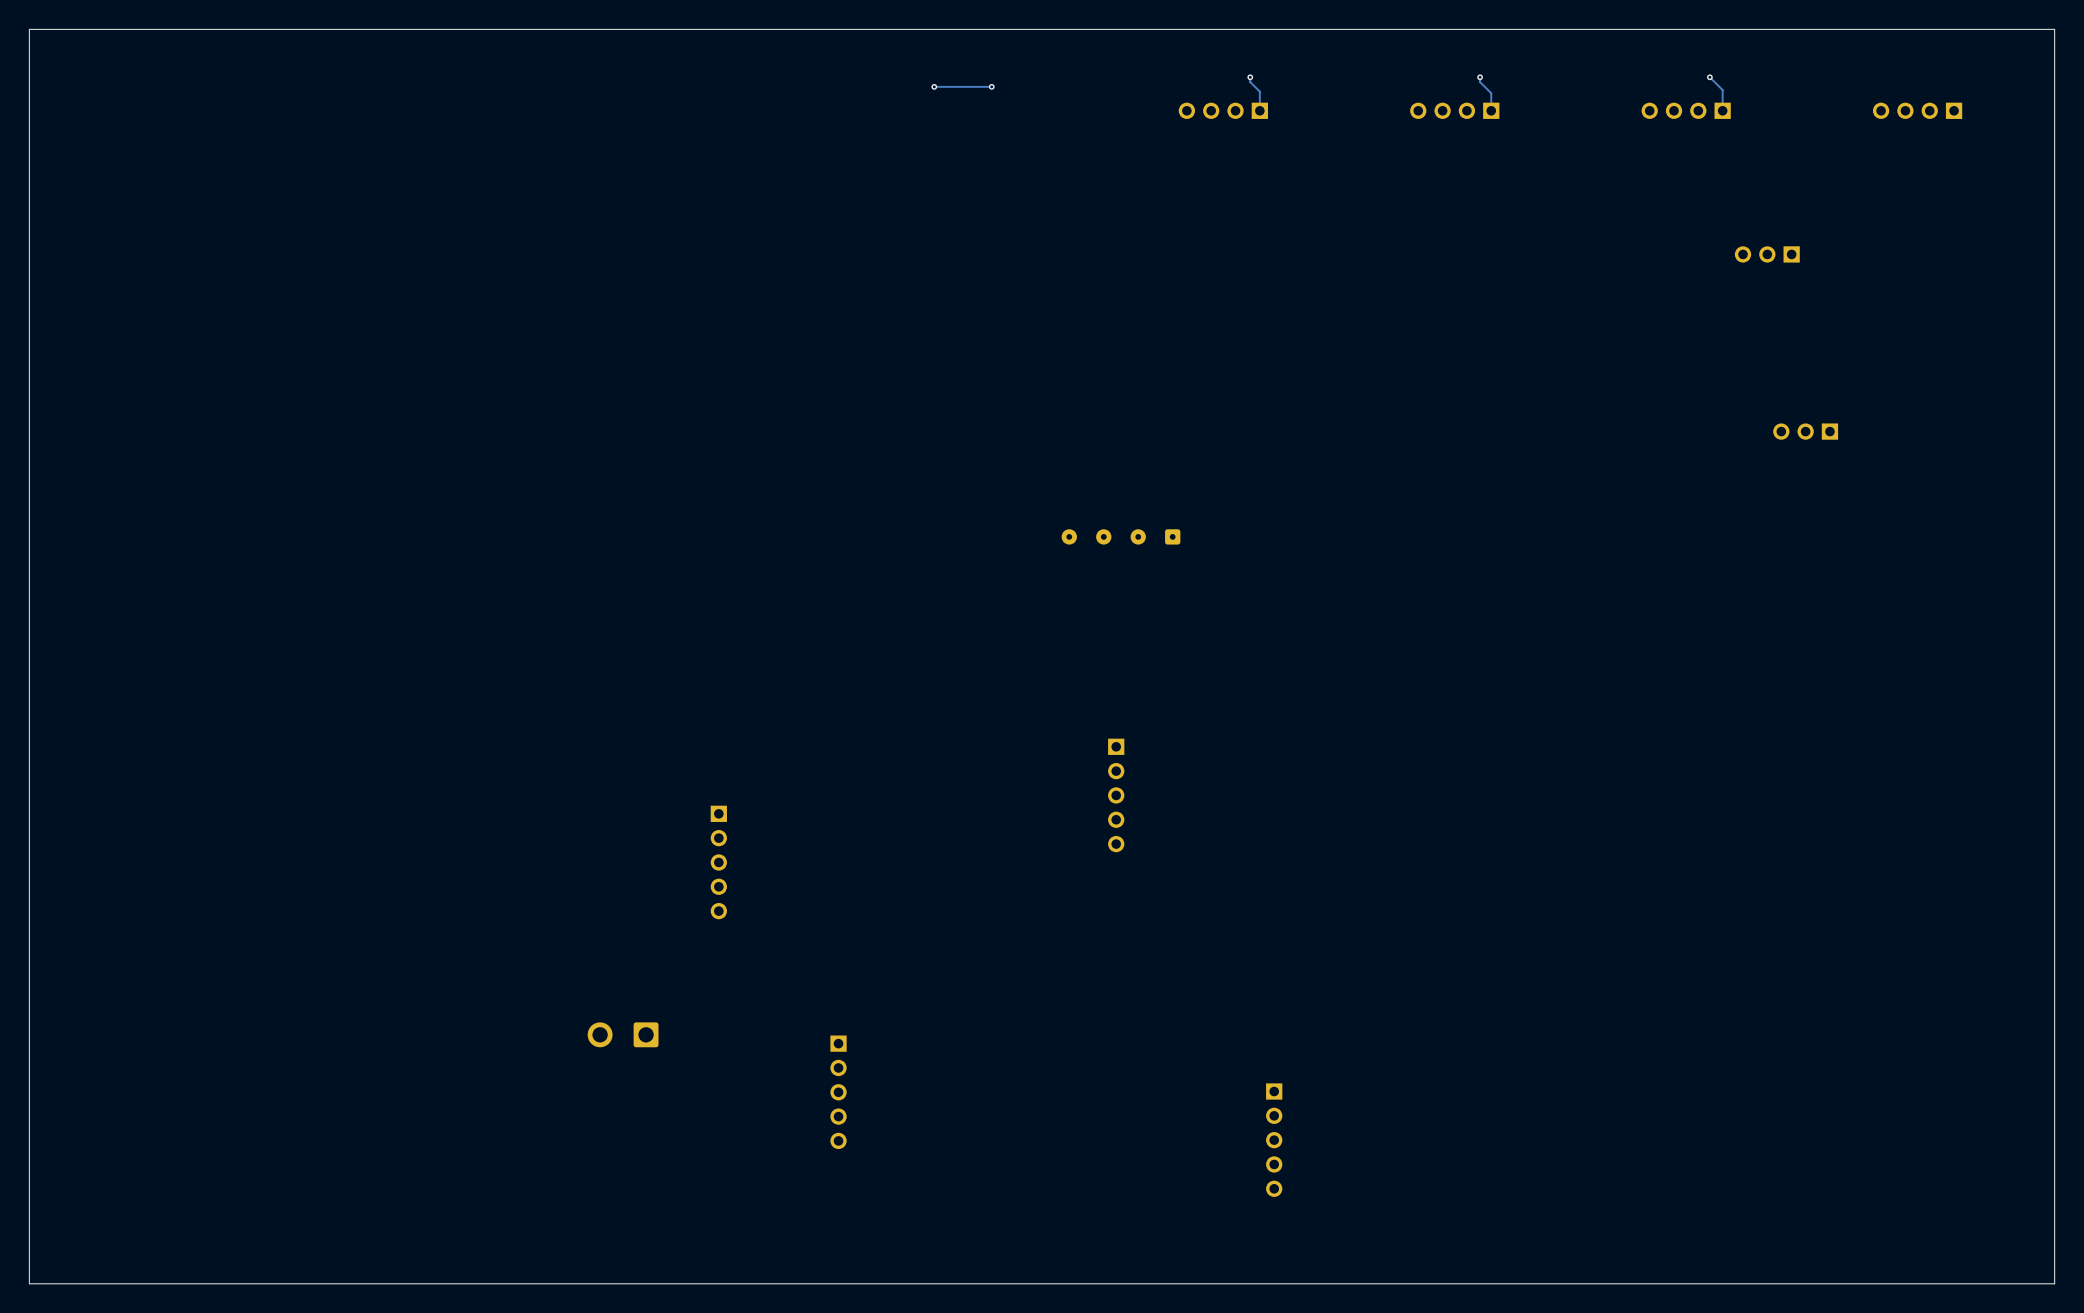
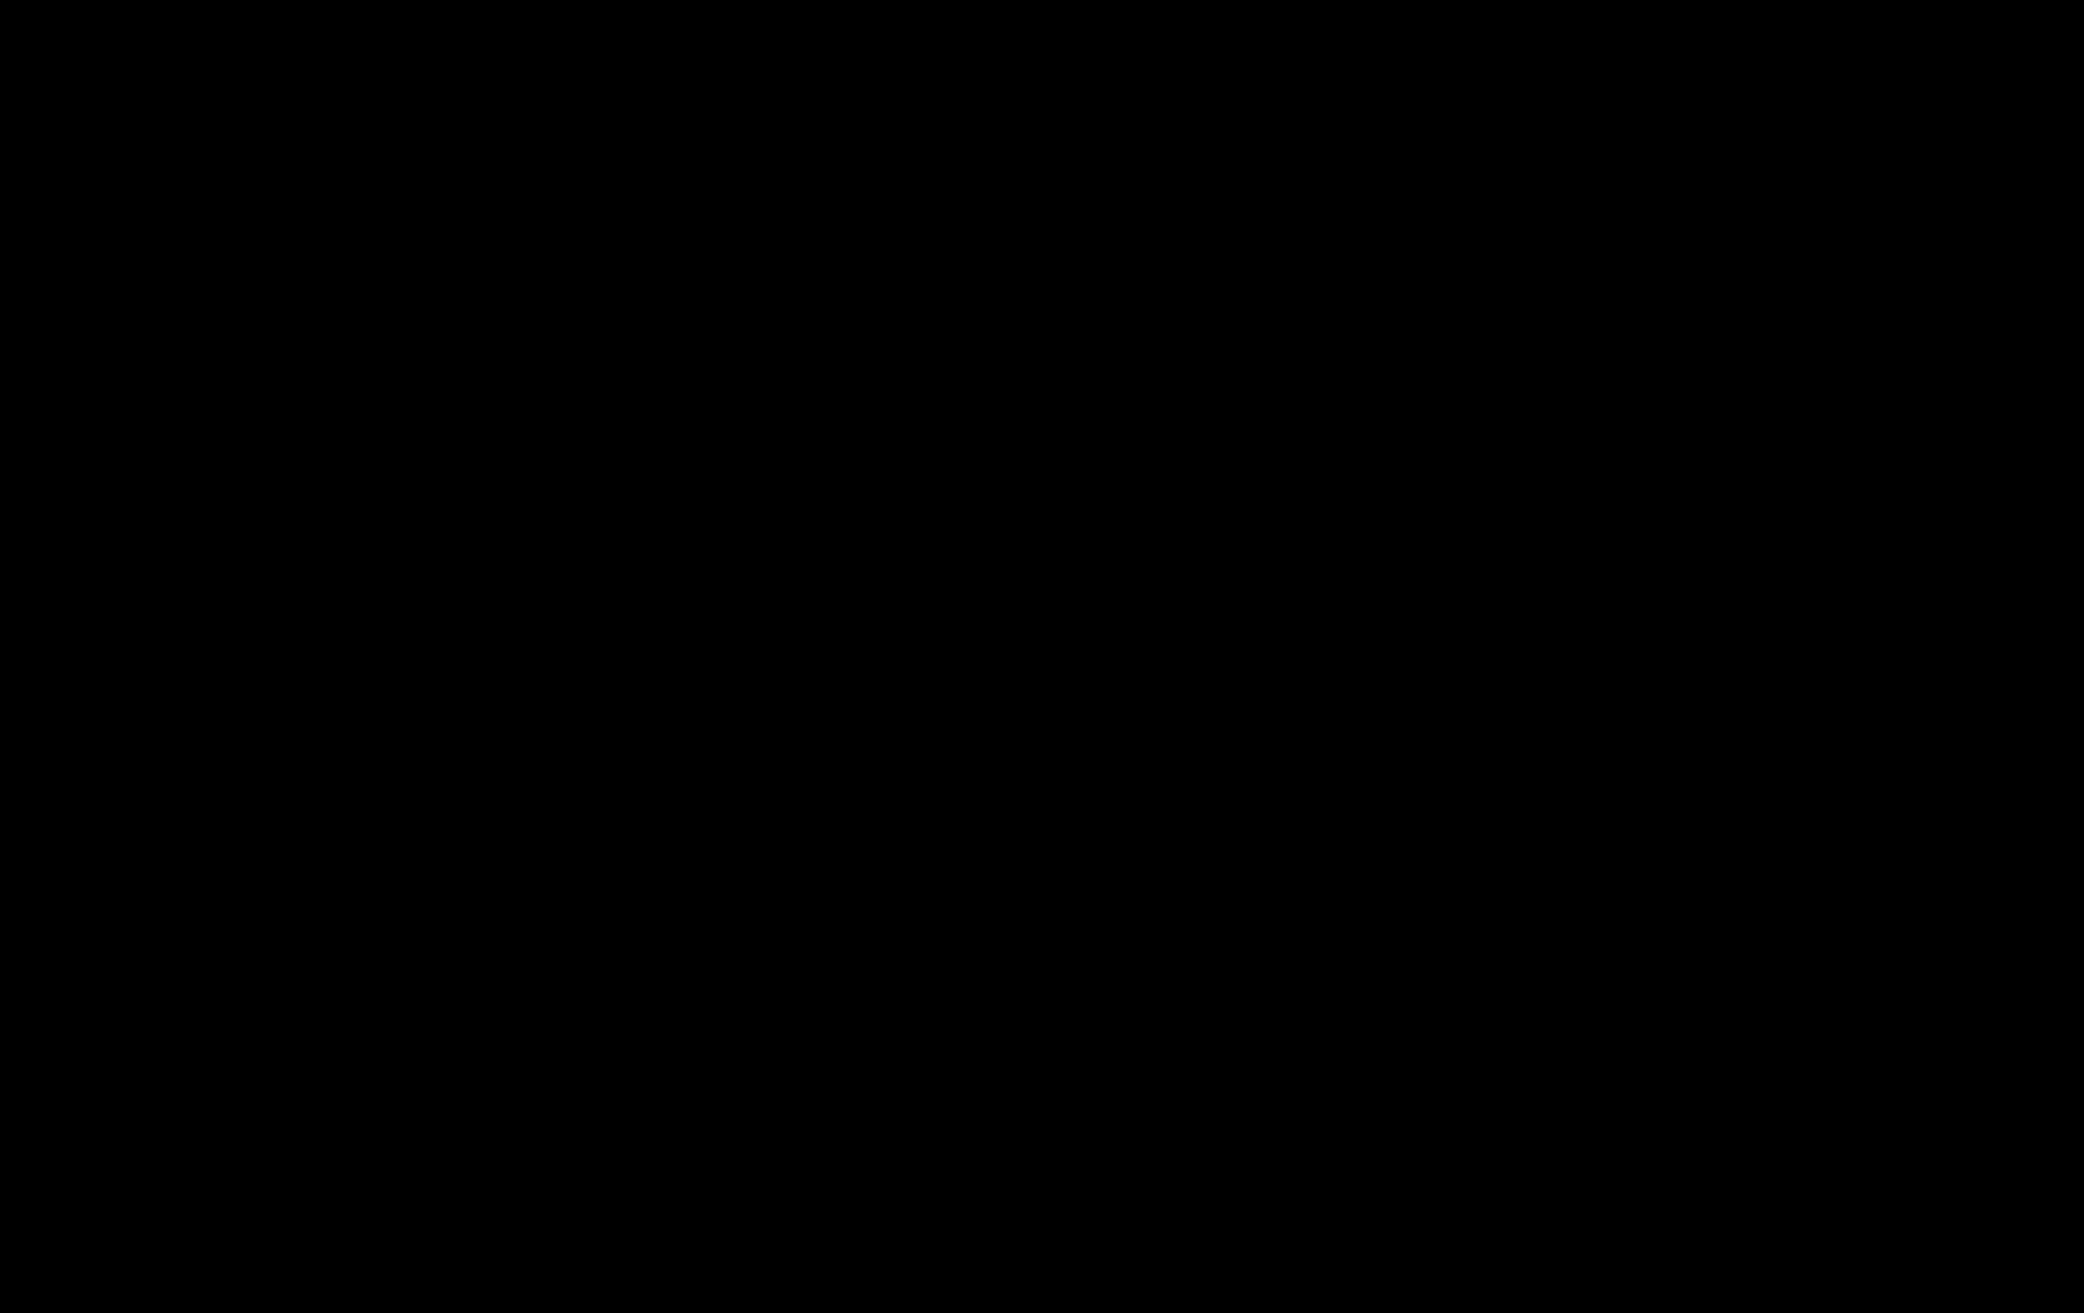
board edge: (2054, 29) (29, 29) (29, 1283) (2054, 1283) (2054, 29) -> none
track: (1250, 77) (1250, 82) (1259, 91) (1259, 110) -> none
via: (1250, 77) -> none
track: (1480, 77) (1480, 82) (1491, 93) (1491, 110) -> none
via: (1480, 77) -> none
track: (1709, 77) (1722, 90) (1722, 110) -> none
via: (1709, 77) -> none
via: (934, 86) -> none
track: (991, 86) (934, 86) -> none
via: (991, 86) -> none
part: (1223, 110) -> none
part: (1454, 110) -> none
part: (1686, 110) -> none
part: (1917, 110) -> none
part: (1767, 254) -> none
part: (1805, 431) -> none
part: (1121, 536) -> none
part: (1116, 795) -> none
part: (718, 862) -> none
part: (623, 1034) -> none
part: (838, 1092) -> none
part: (1274, 1140) -> none

